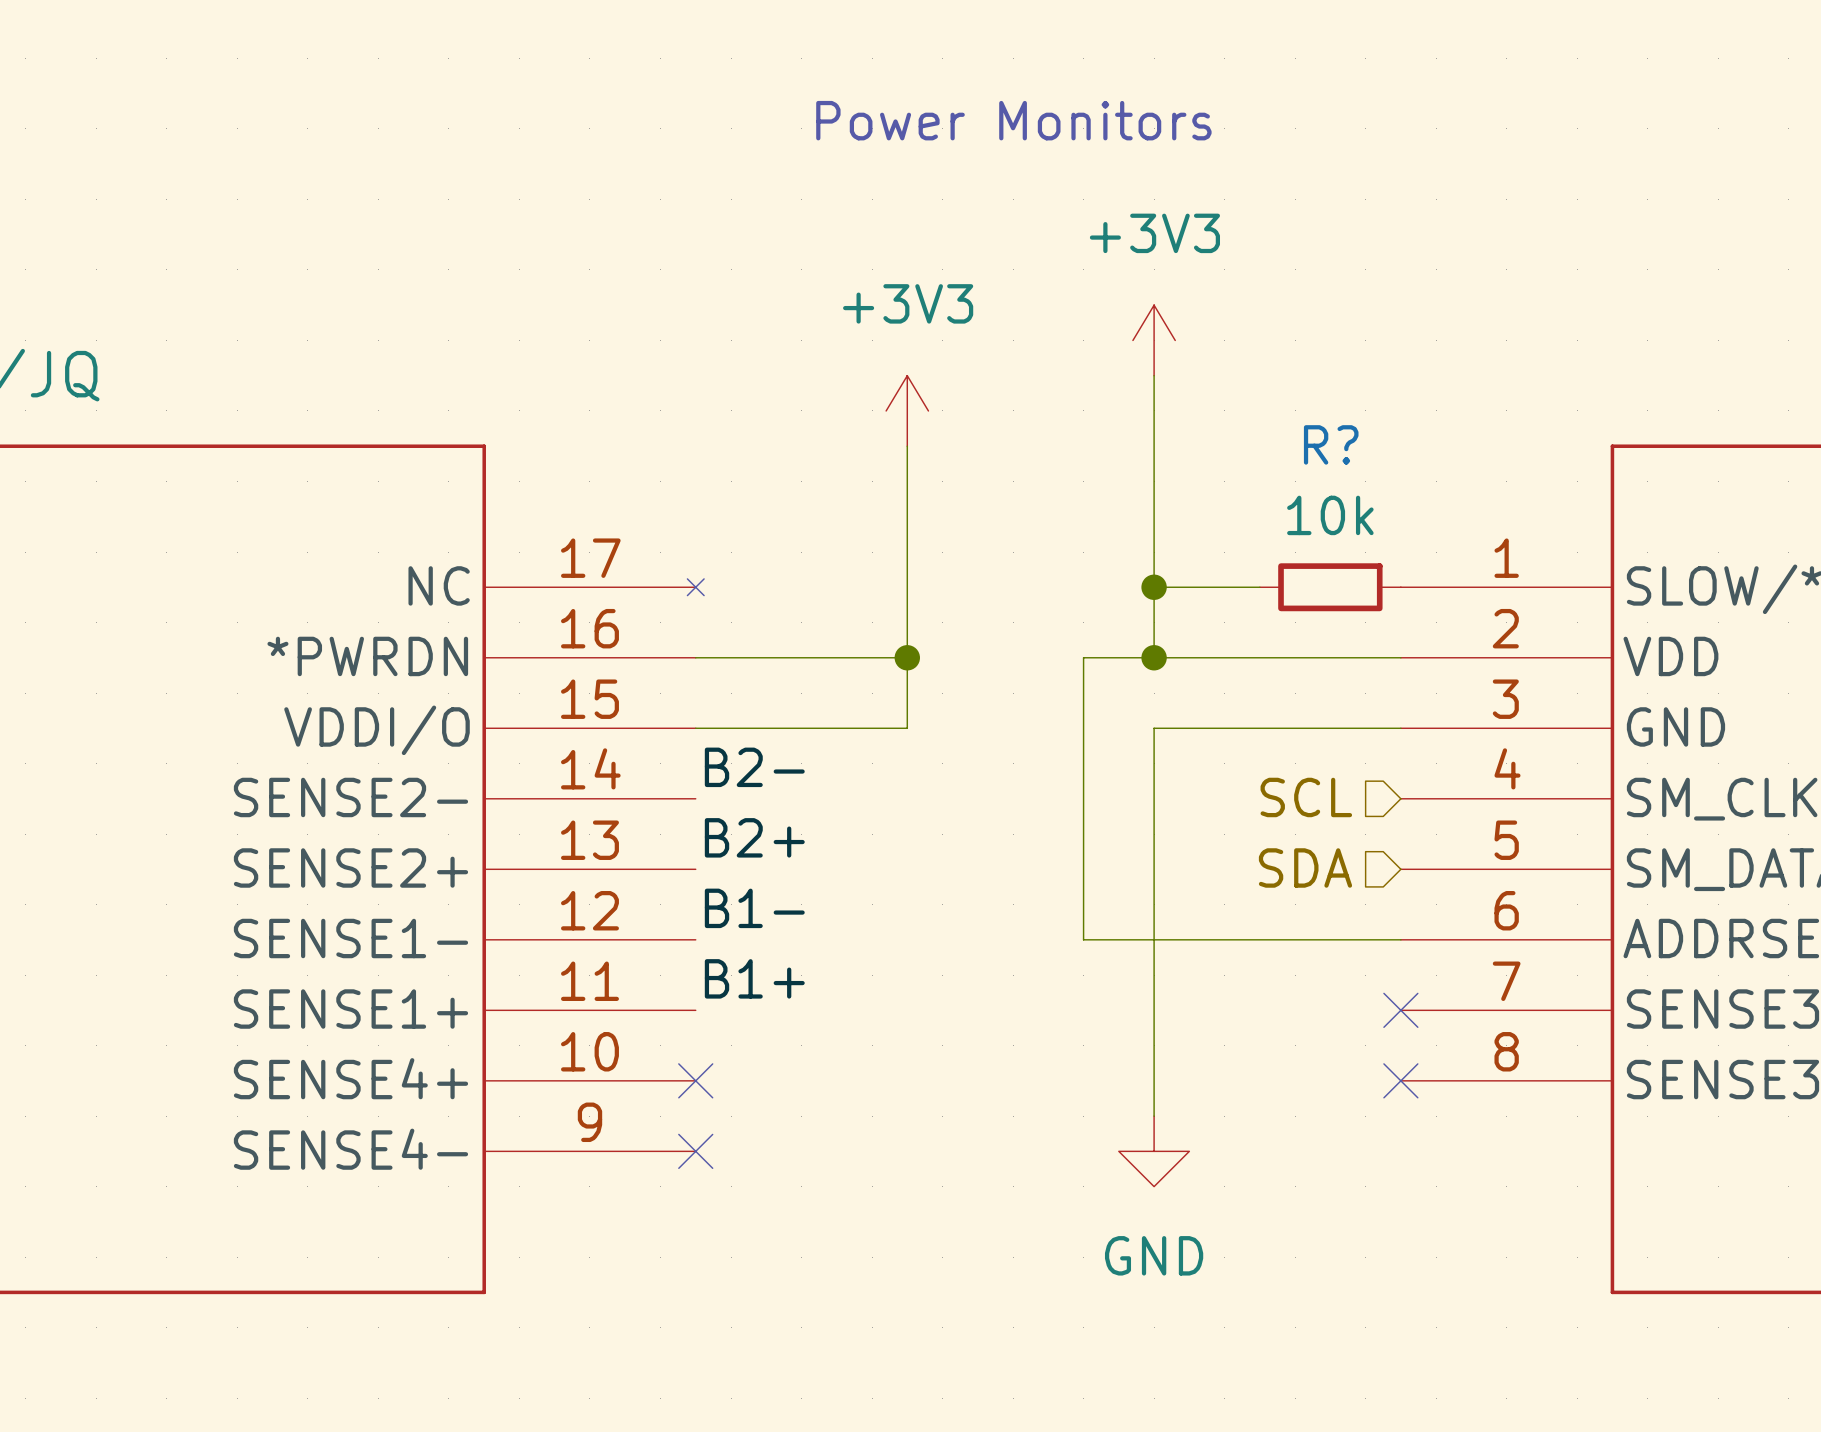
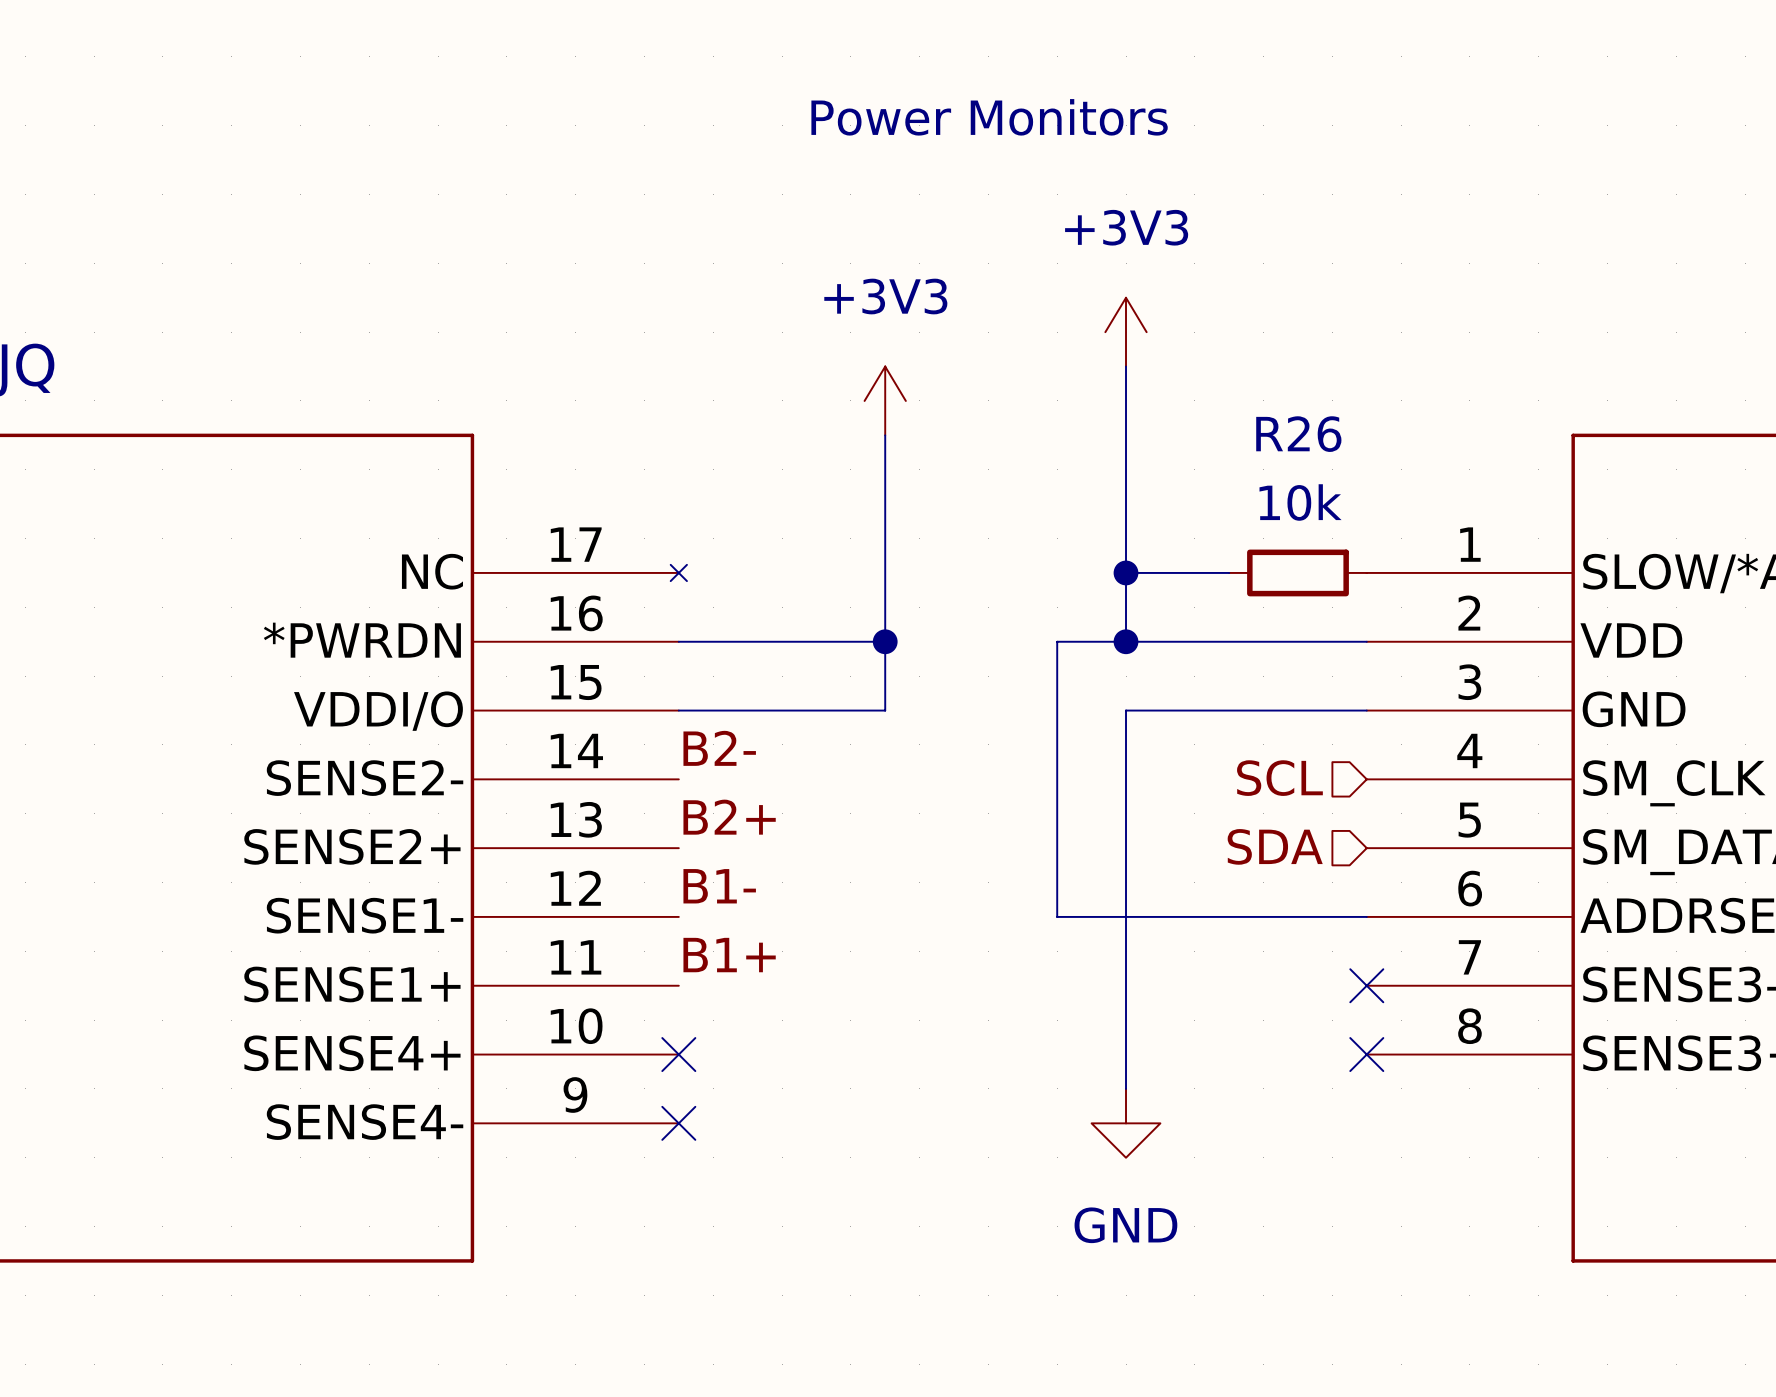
R? name: R? (1331, 444) -> R26 (1298, 434)

